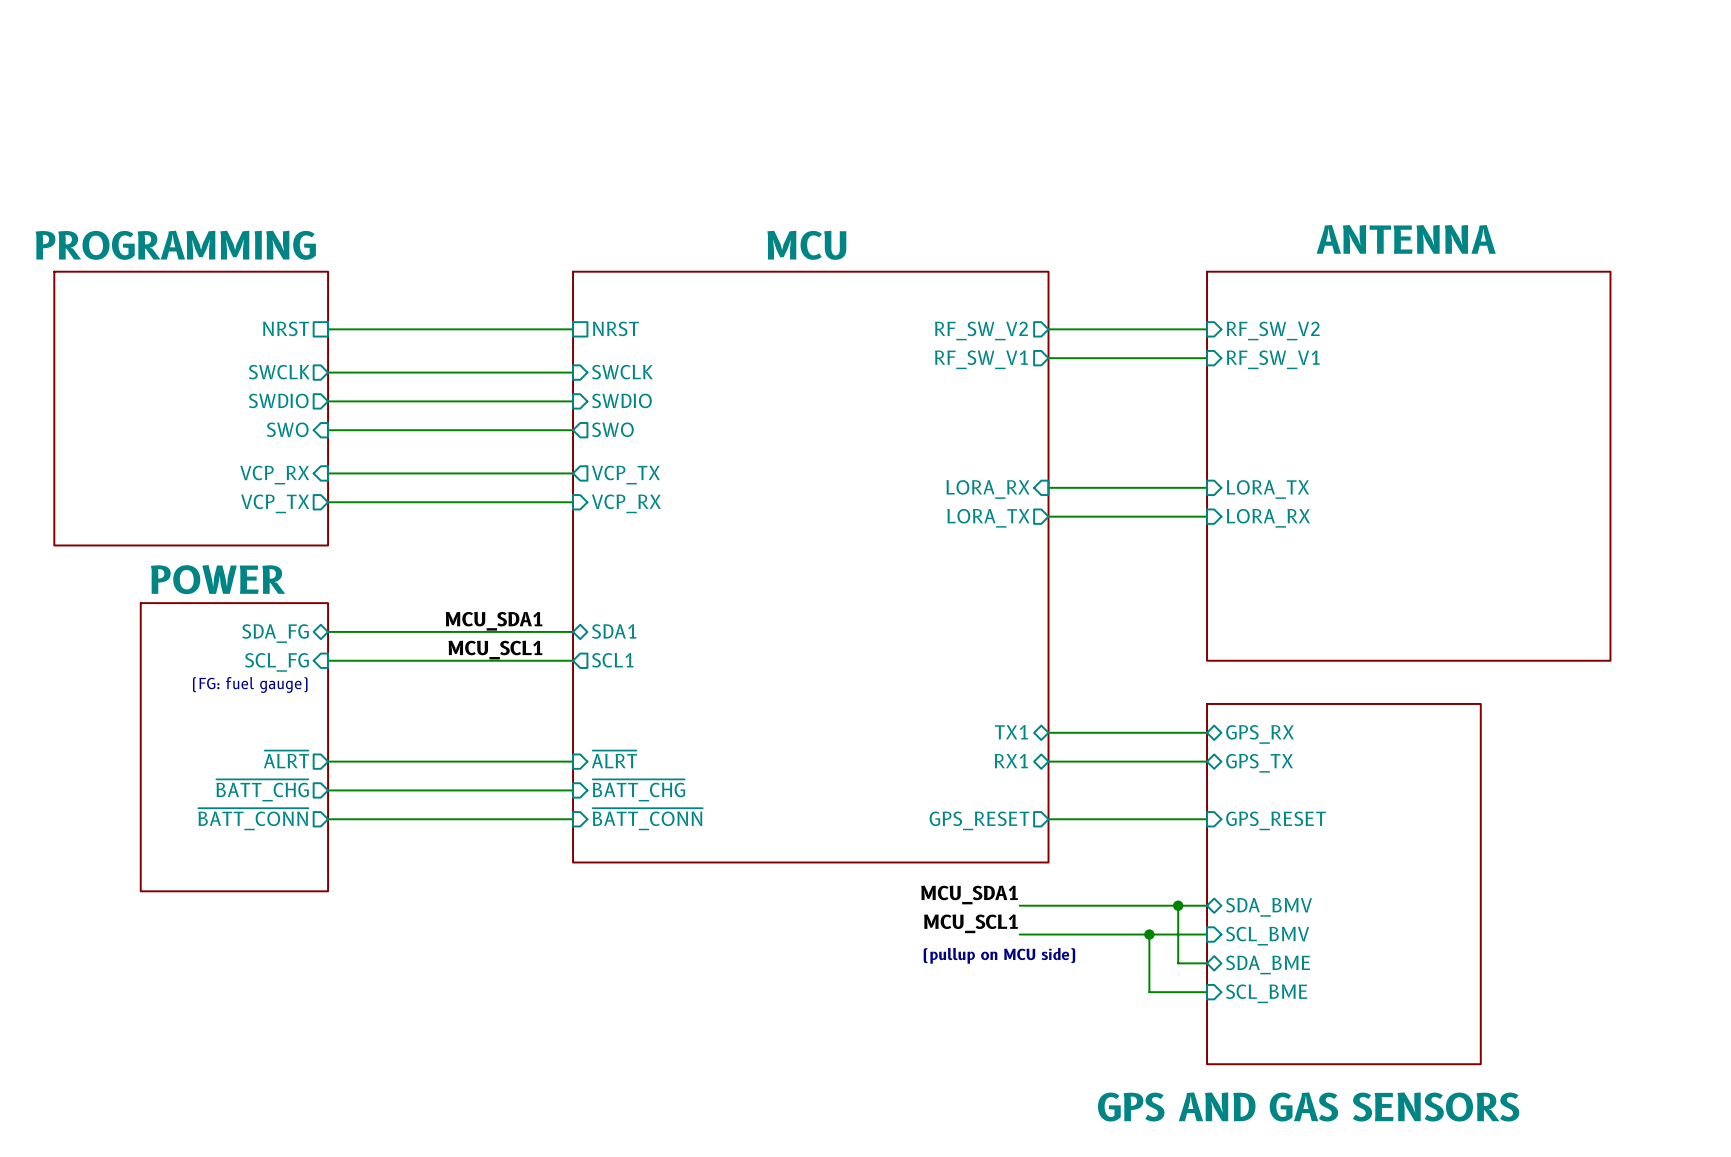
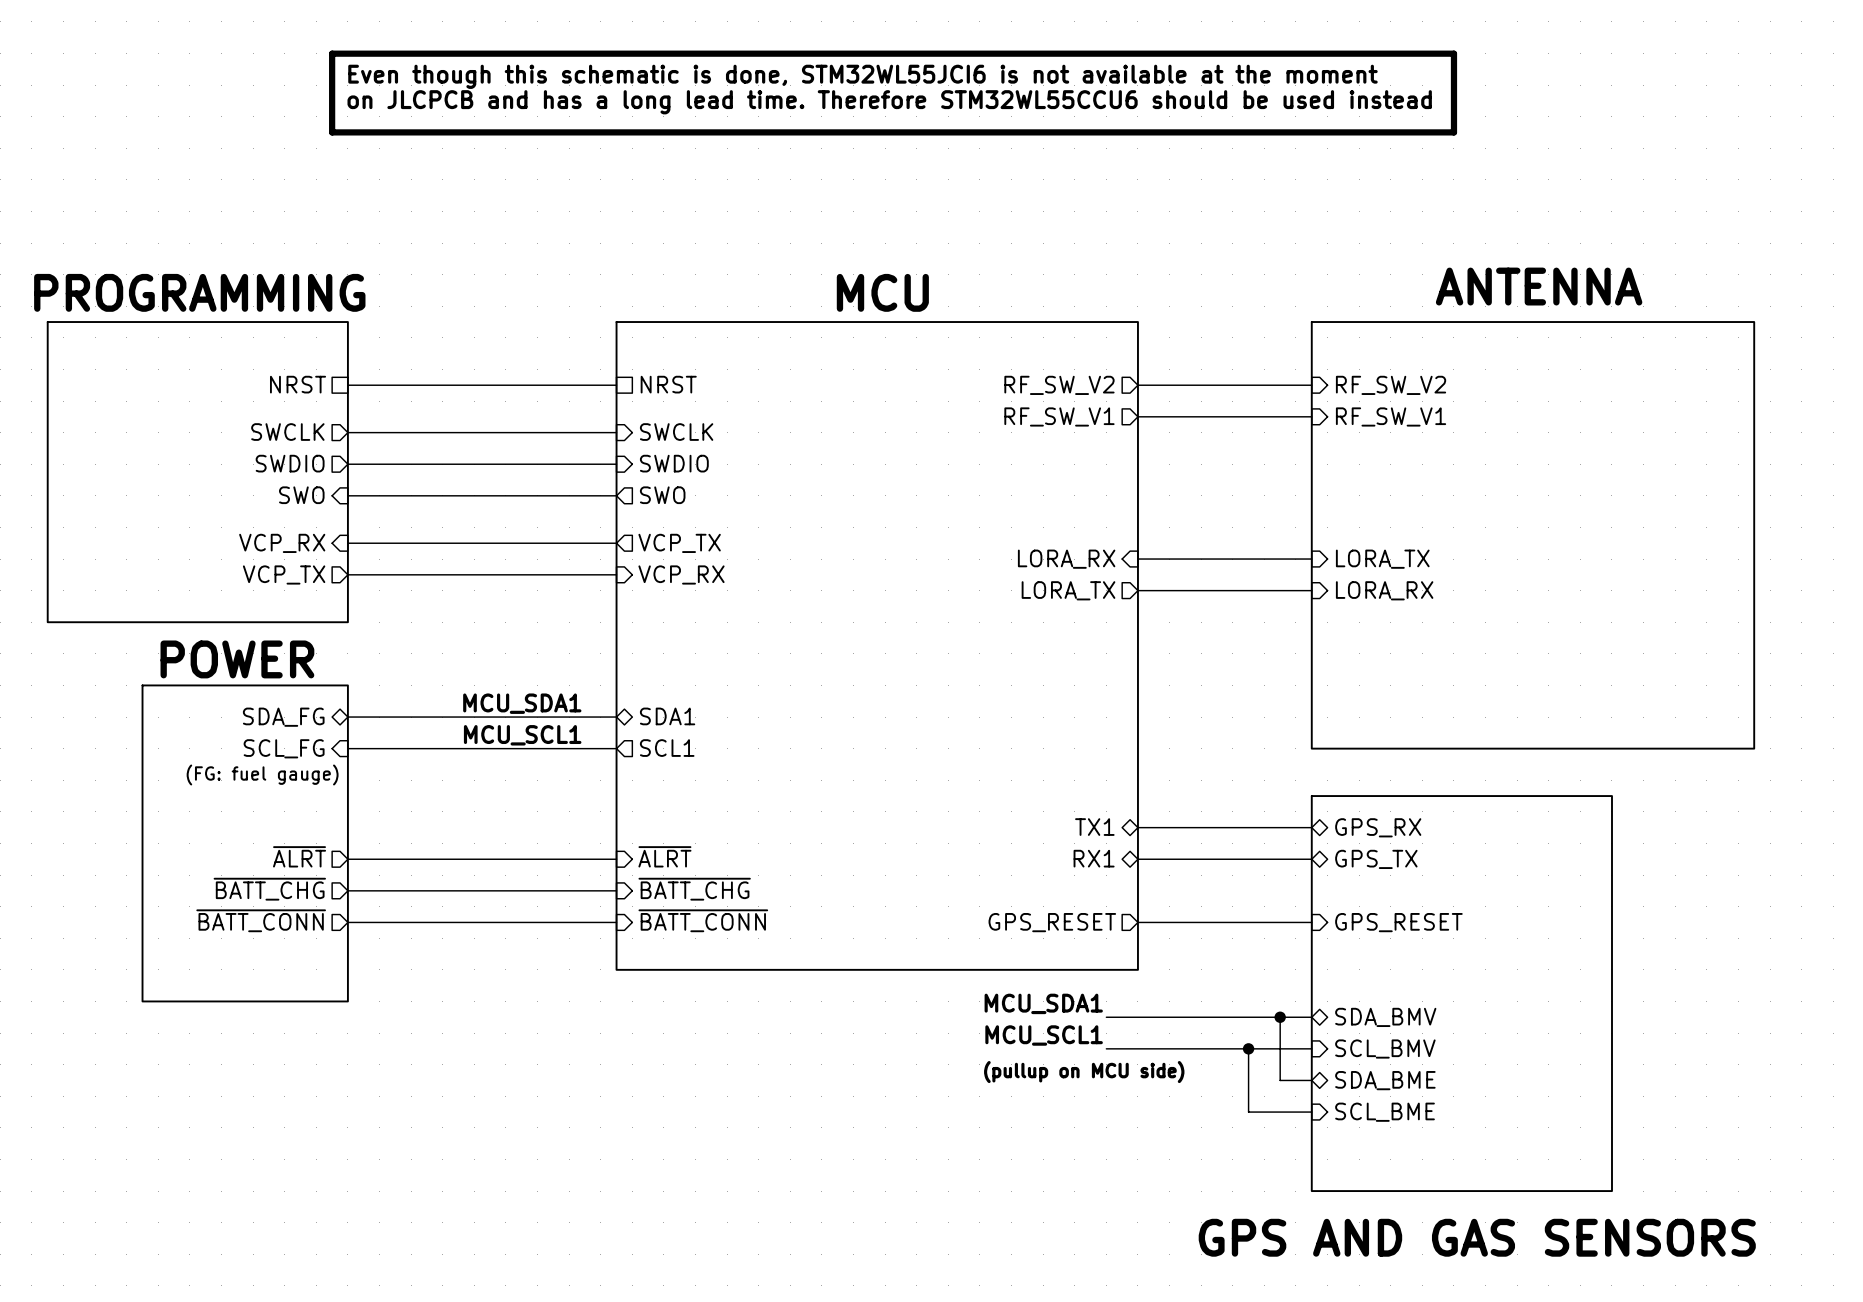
line: none -> (332, 53) (1453, 53) (1453, 132) (332, 132) (332, 53)
text: none -> Even though this schematic is done, STM32WL55JCI6 is not available at the moment (862, 76)
text: none -> on JLCPCB and has a long lead time. Therefore STM32WL55CCU6 should be used instead (889, 102)

